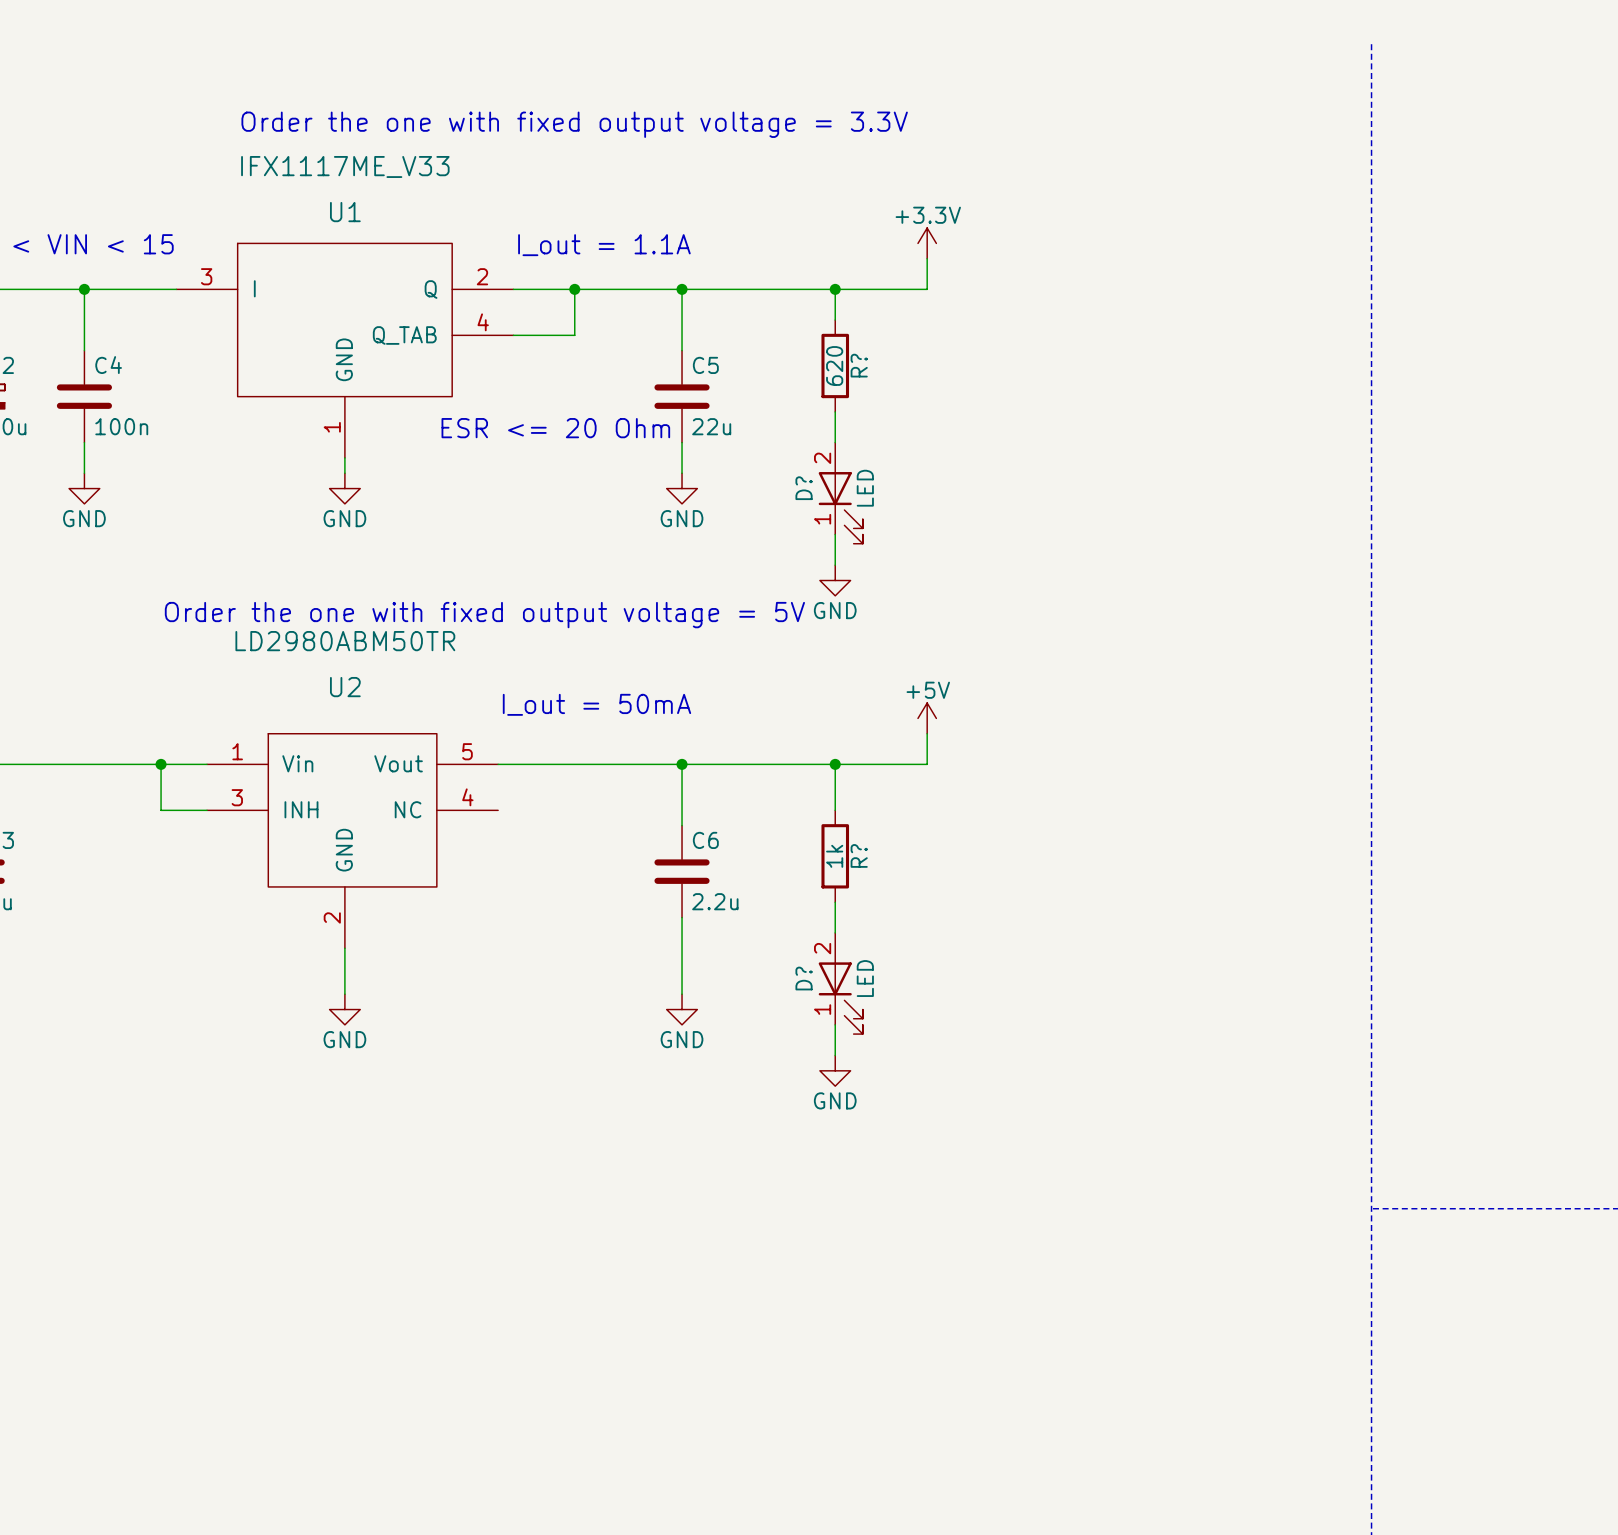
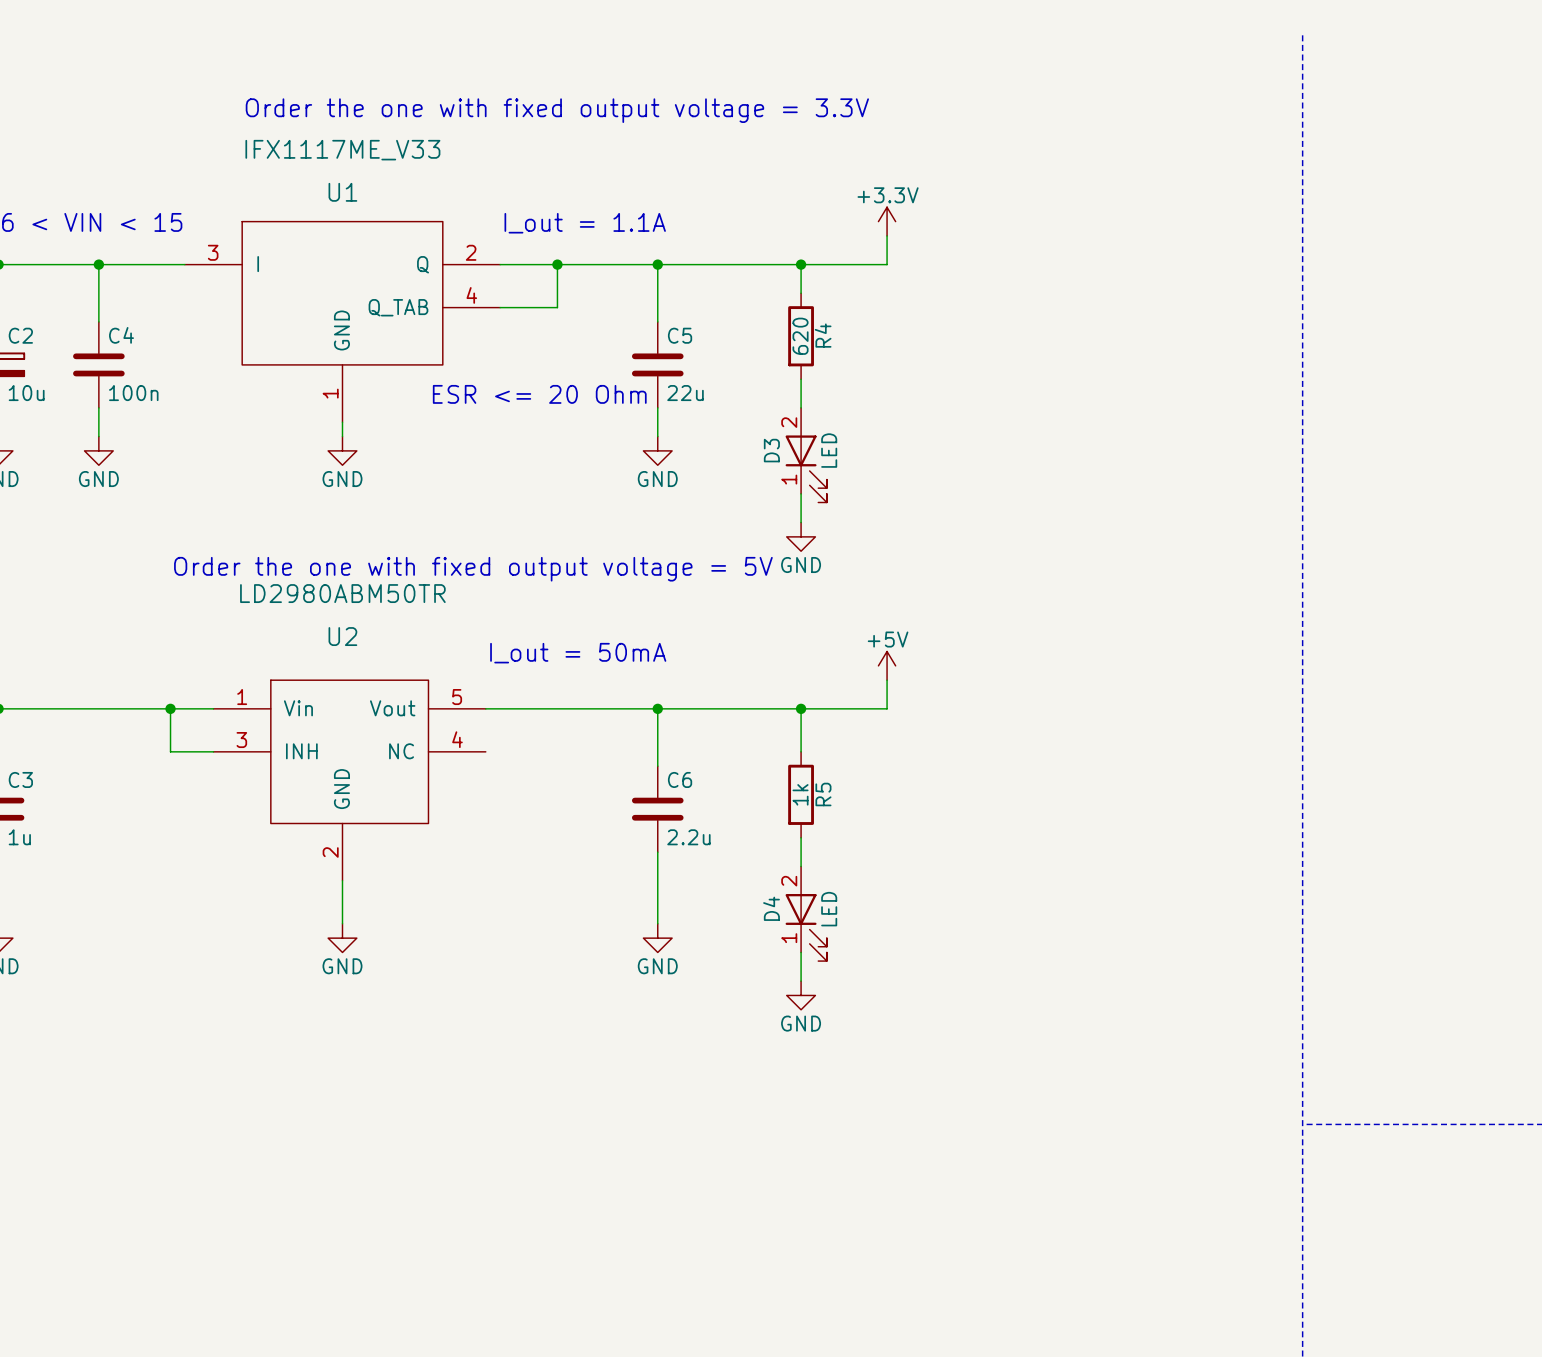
R? name: R? (859, 365) -> R4 (823, 335)
D? name: D? (804, 488) -> D3 (771, 450)
R? name: R? (859, 855) -> R5 (823, 794)
D? name: D? (804, 978) -> D4 (771, 908)

